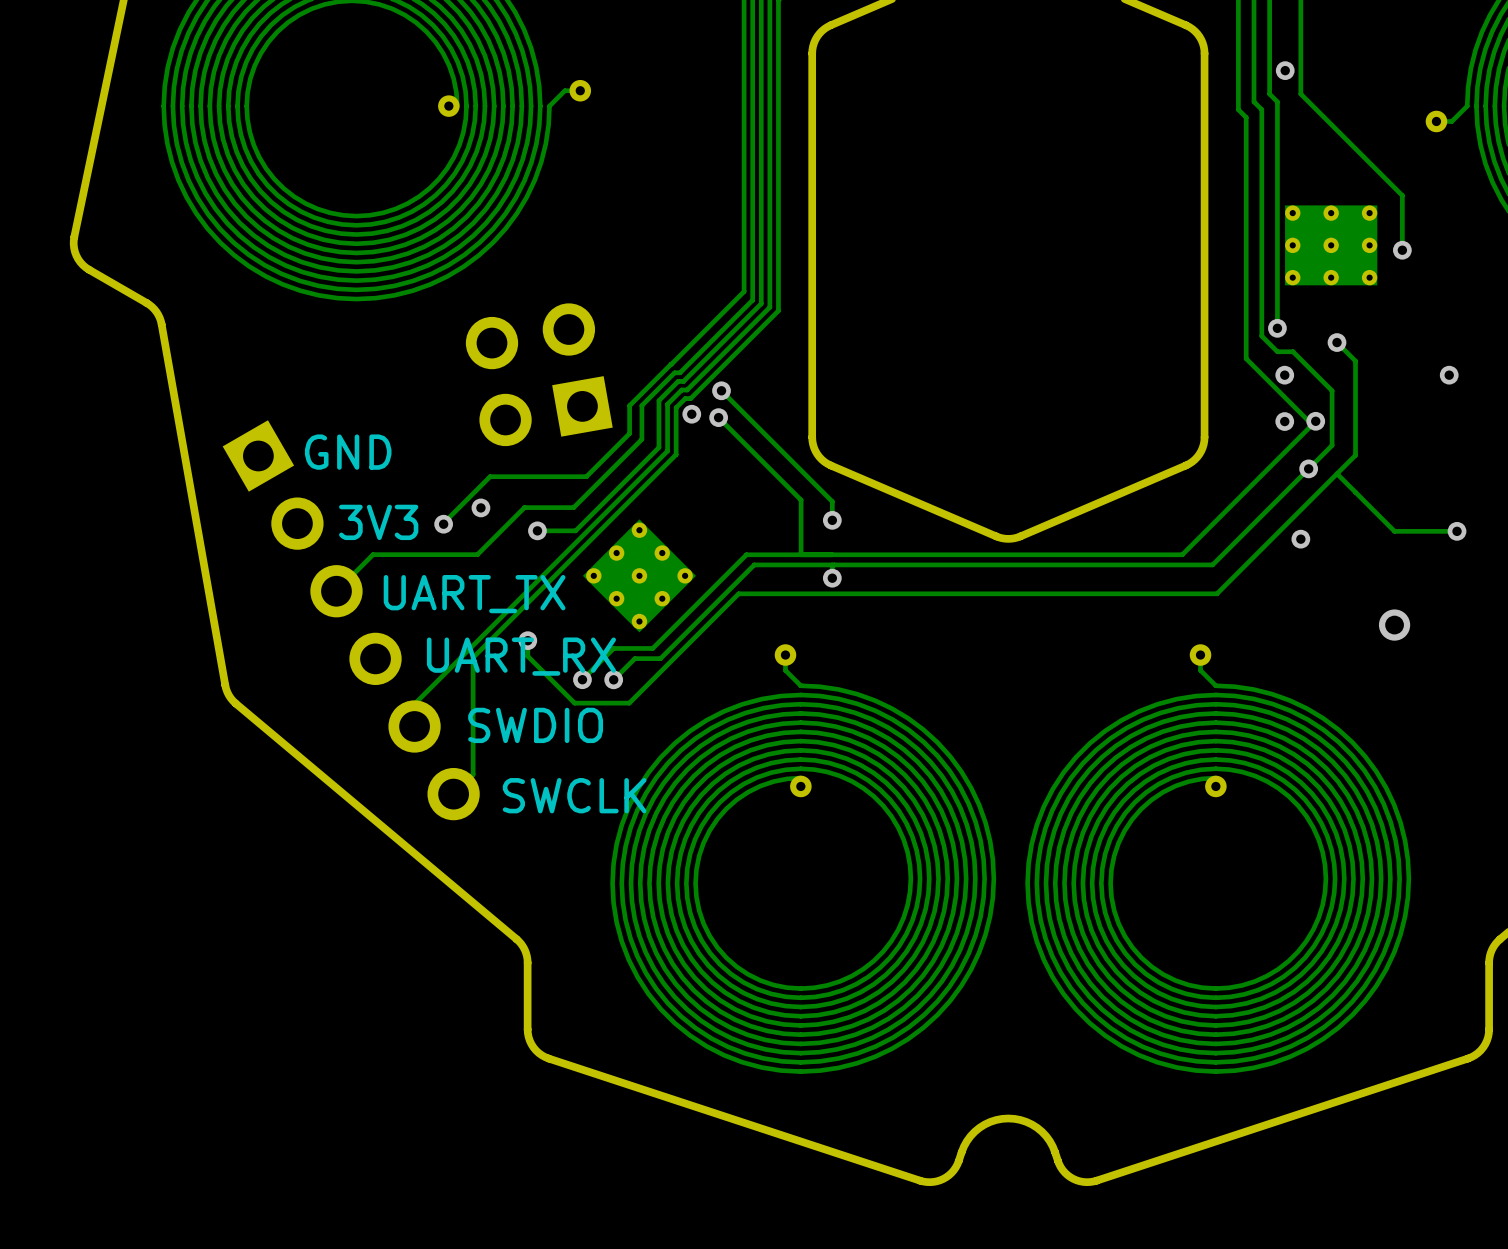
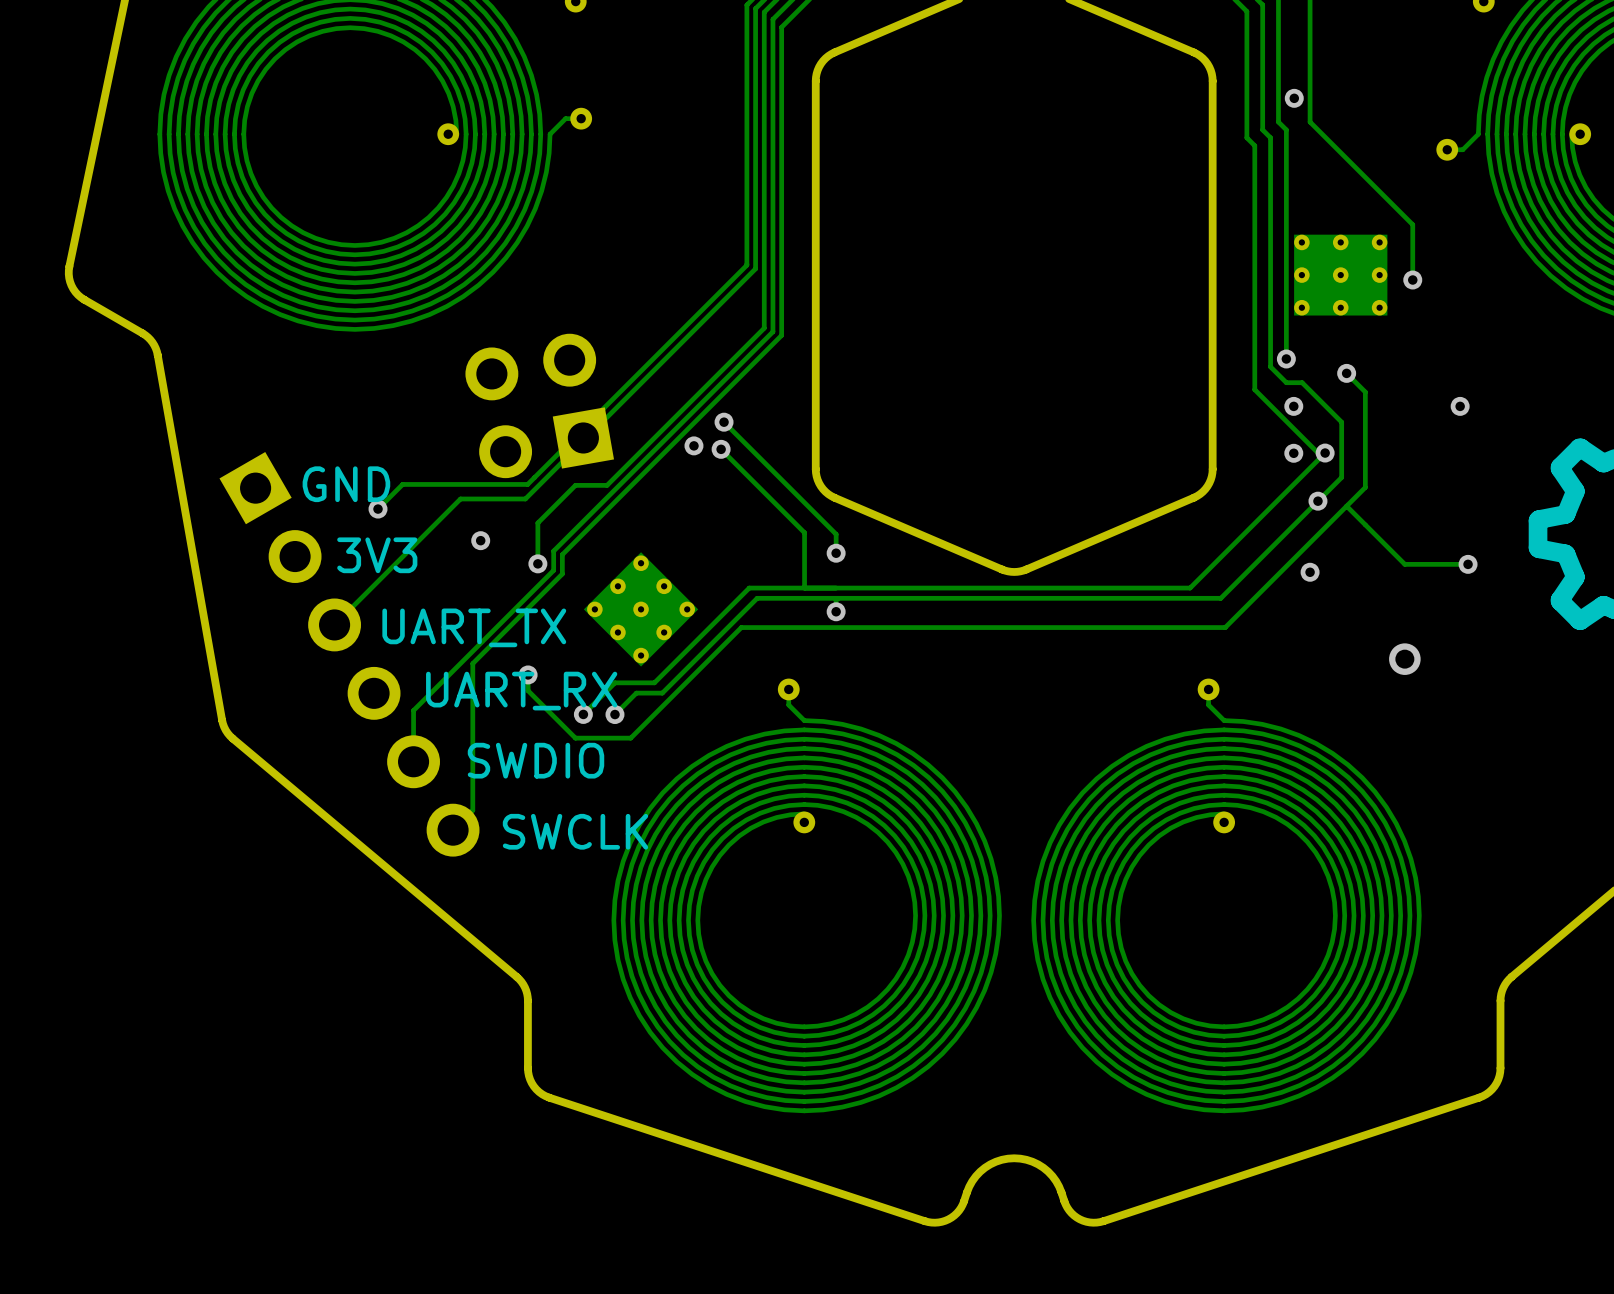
track: (744, 235) (744, 291) (671, 364) -> (746, 265) (527, 484) (402, 484) (378, 509)
track: (752, 239) (752, 300) (679, 372) (674, 372) (641, 405) (641, 439) (573, 507) (524, 507) (477, 554) (373, 554) -> (755, 268) (525, 498) (460, 498) (371, 587)
track: (761, 297) (761, 303) (683, 381) (678, 381) (658, 400) (658, 447) (575, 530) (537, 530) -> (764, 328) (607, 485) (575, 485) (537, 522) (537, 563)
track: (769, 301) (769, 307) (687, 390) (681, 390) (667, 404) (667, 451) (414, 704) -> (772, 331) (553, 551) (553, 570) (413, 710) (413, 739)
track: (778, 304) (778, 310) (690, 398) (685, 398) (676, 407) (676, 454) (473, 657) -> (781, 335) (562, 554) (562, 574) (472, 663) (472, 692)
track: (671, 364) (629, 405) (629, 433) (586, 476) (490, 476) (443, 524) -> none
via position: (443, 524) -> (378, 509)

